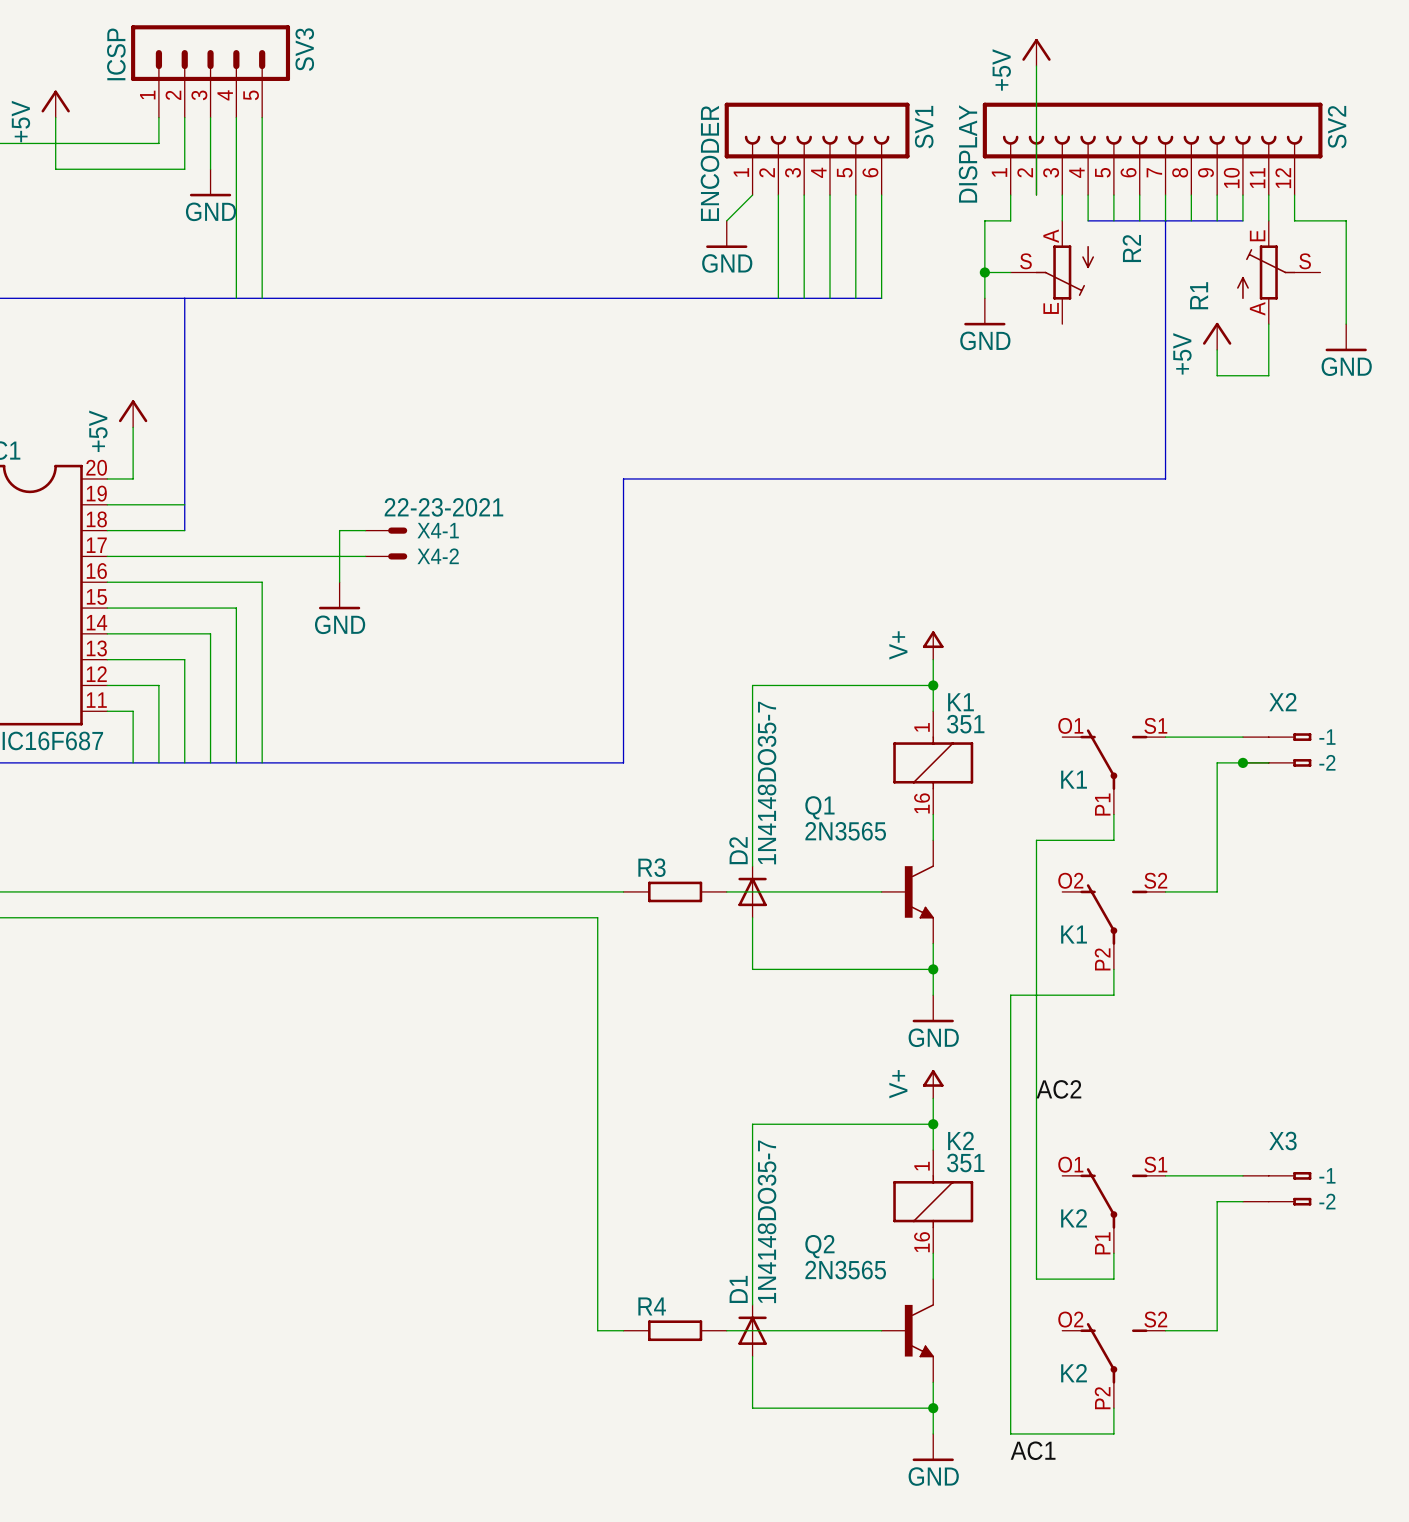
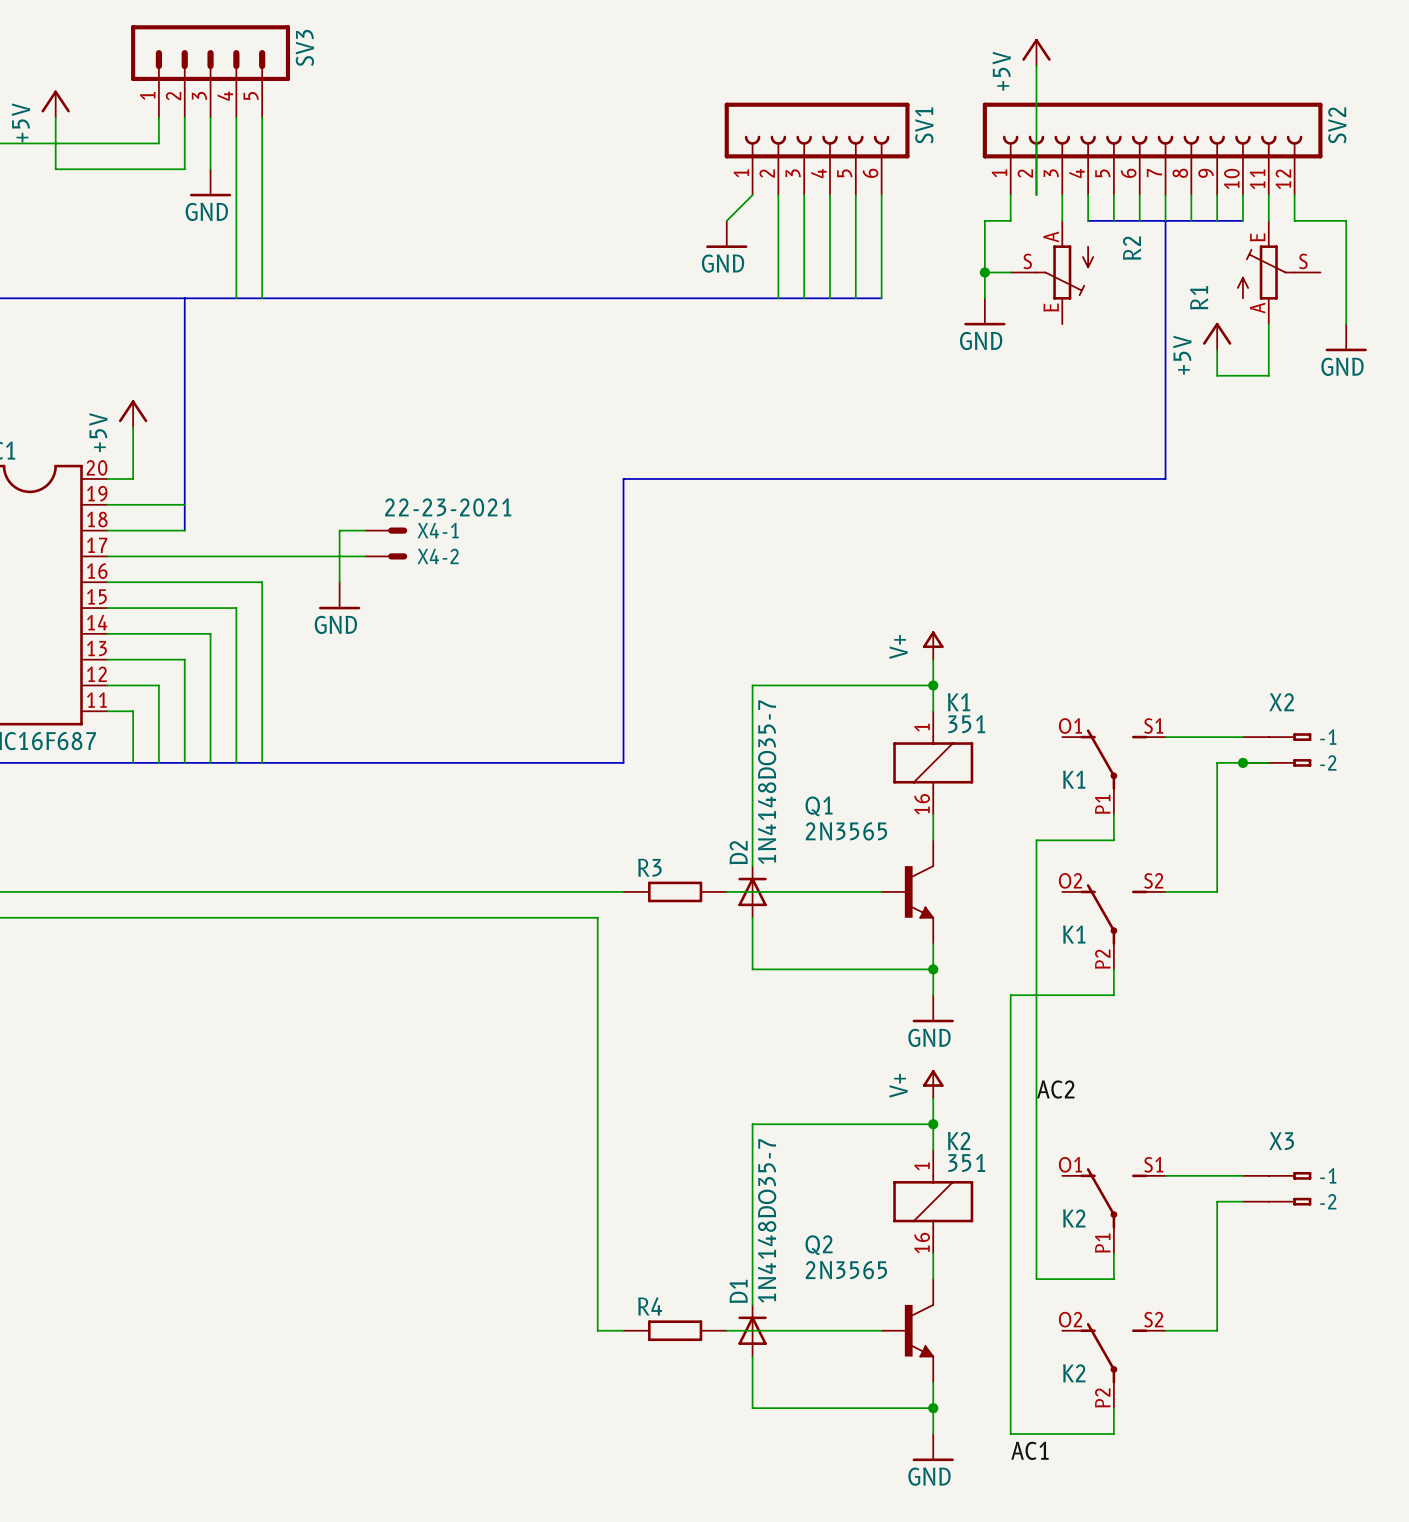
SV3 value: ICSP (116, 54) -> none
SV2 value: DISPLAY (968, 153) -> none
SV1 value: ENCODER (709, 163) -> none

